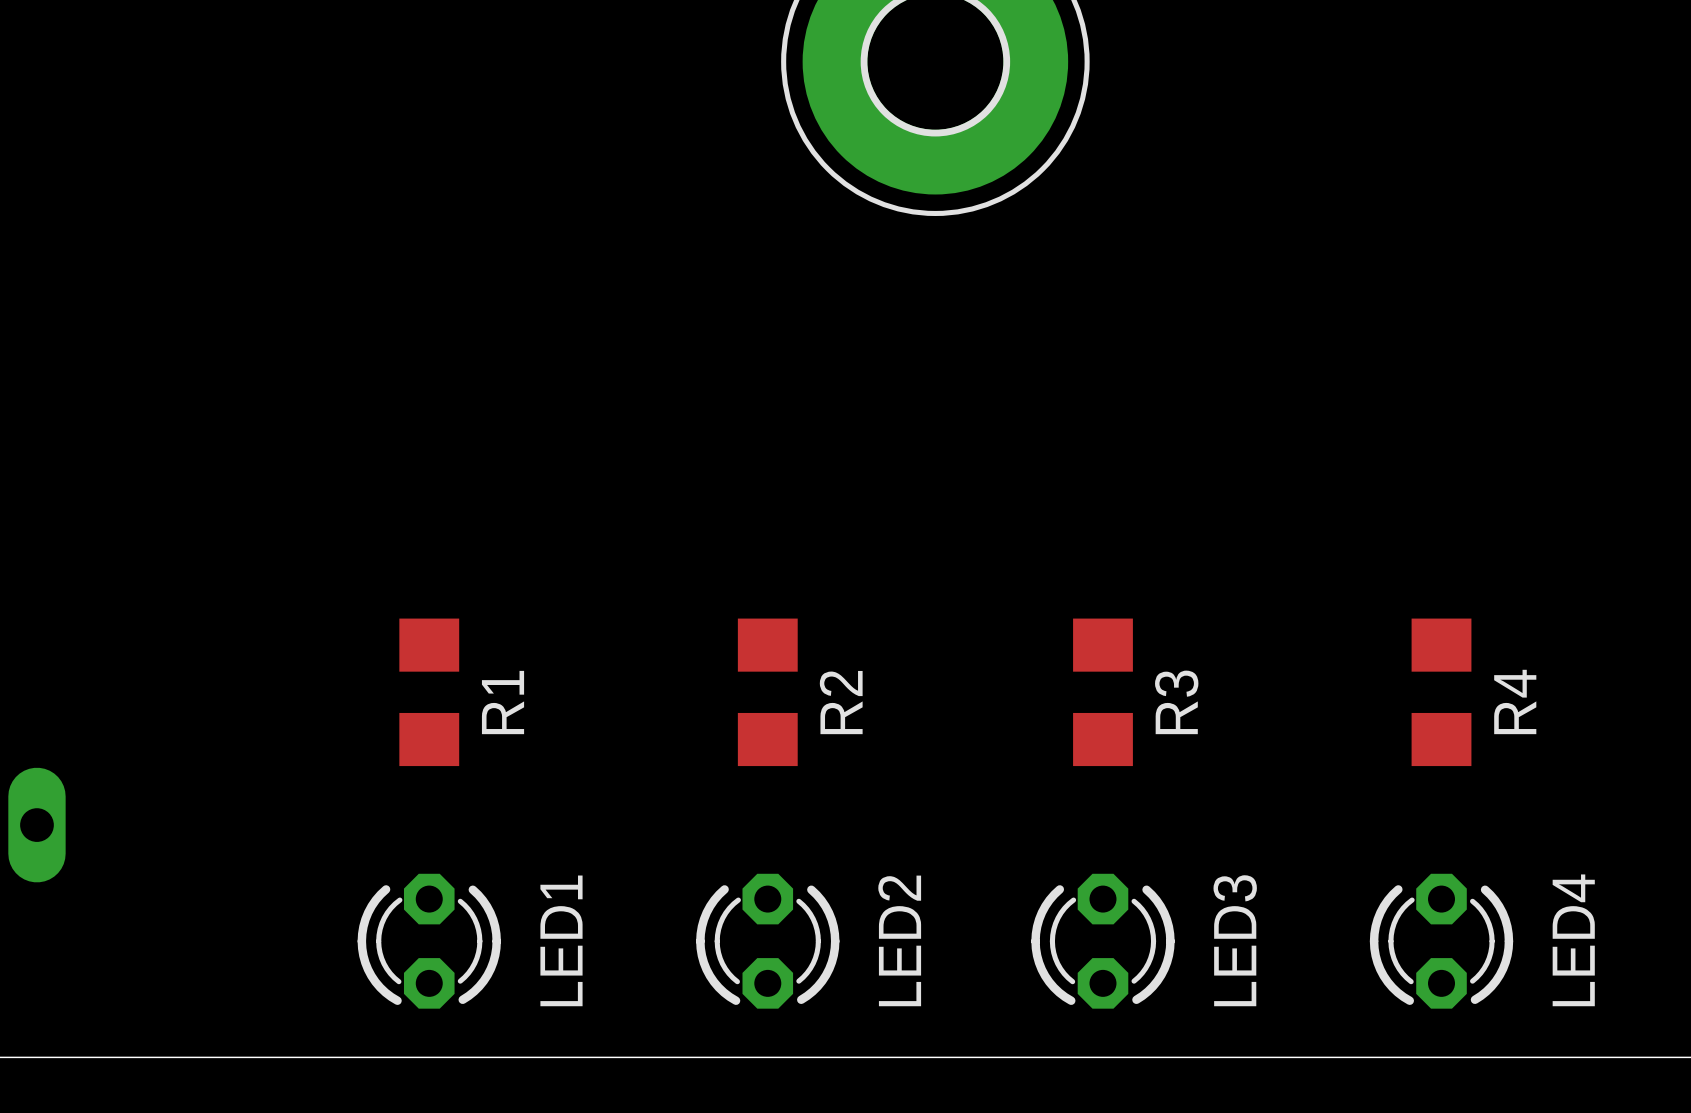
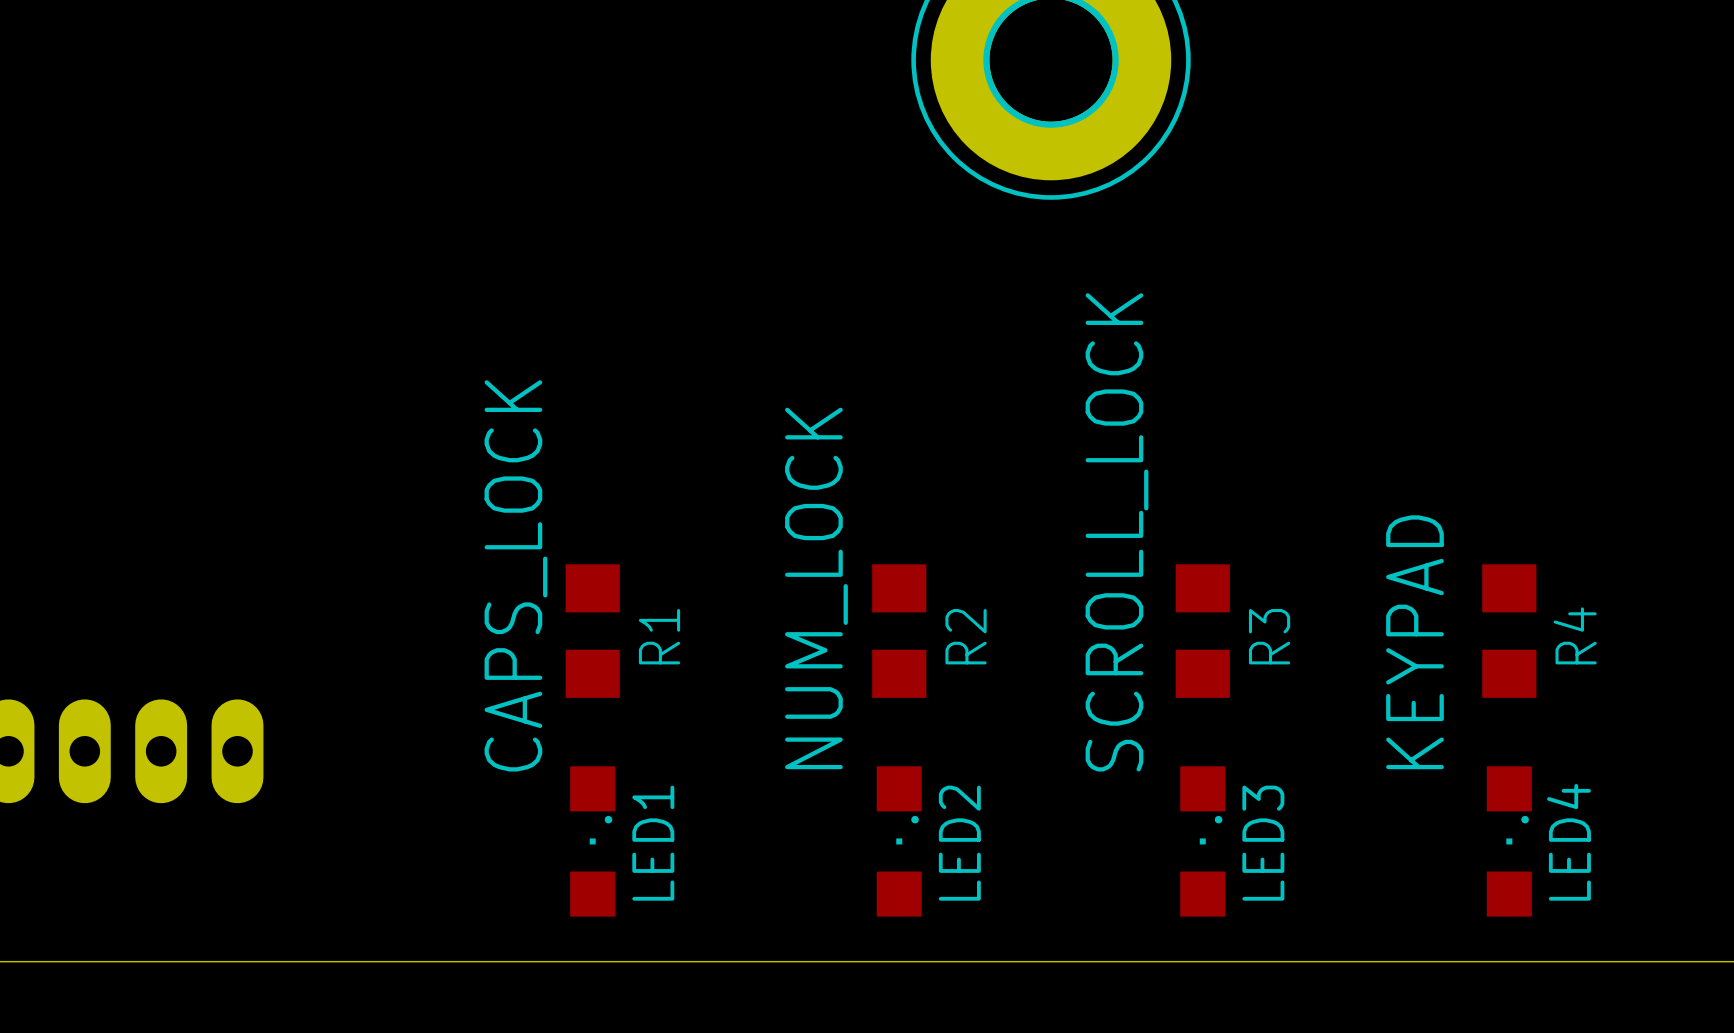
text: none -> SCROLL_LOCK (1116, 532)
text: none -> CAPS_LOCK (515, 575)
text: none -> NUM_LOCK (816, 588)
text: none -> KEYPAD (1414, 642)
LED1 footprint: [357, 873, 501, 1009] -> [570, 766, 616, 917]
LED2 footprint: [696, 873, 840, 1009] -> [876, 766, 922, 917]
LED3 footprint: [1031, 873, 1175, 1009] -> [1180, 766, 1226, 917]
LED4 footprint: [1369, 873, 1514, 1009] -> [1486, 766, 1532, 917]
LED1 name position: LED1 (561, 940) -> LED1 (653, 843)
LED2 name position: LED2 (899, 940) -> LED2 (959, 843)
LED3 name position: LED3 (1235, 940) -> LED3 (1263, 843)
LED4 name position: LED4 (1573, 940) -> LED4 (1568, 842)

